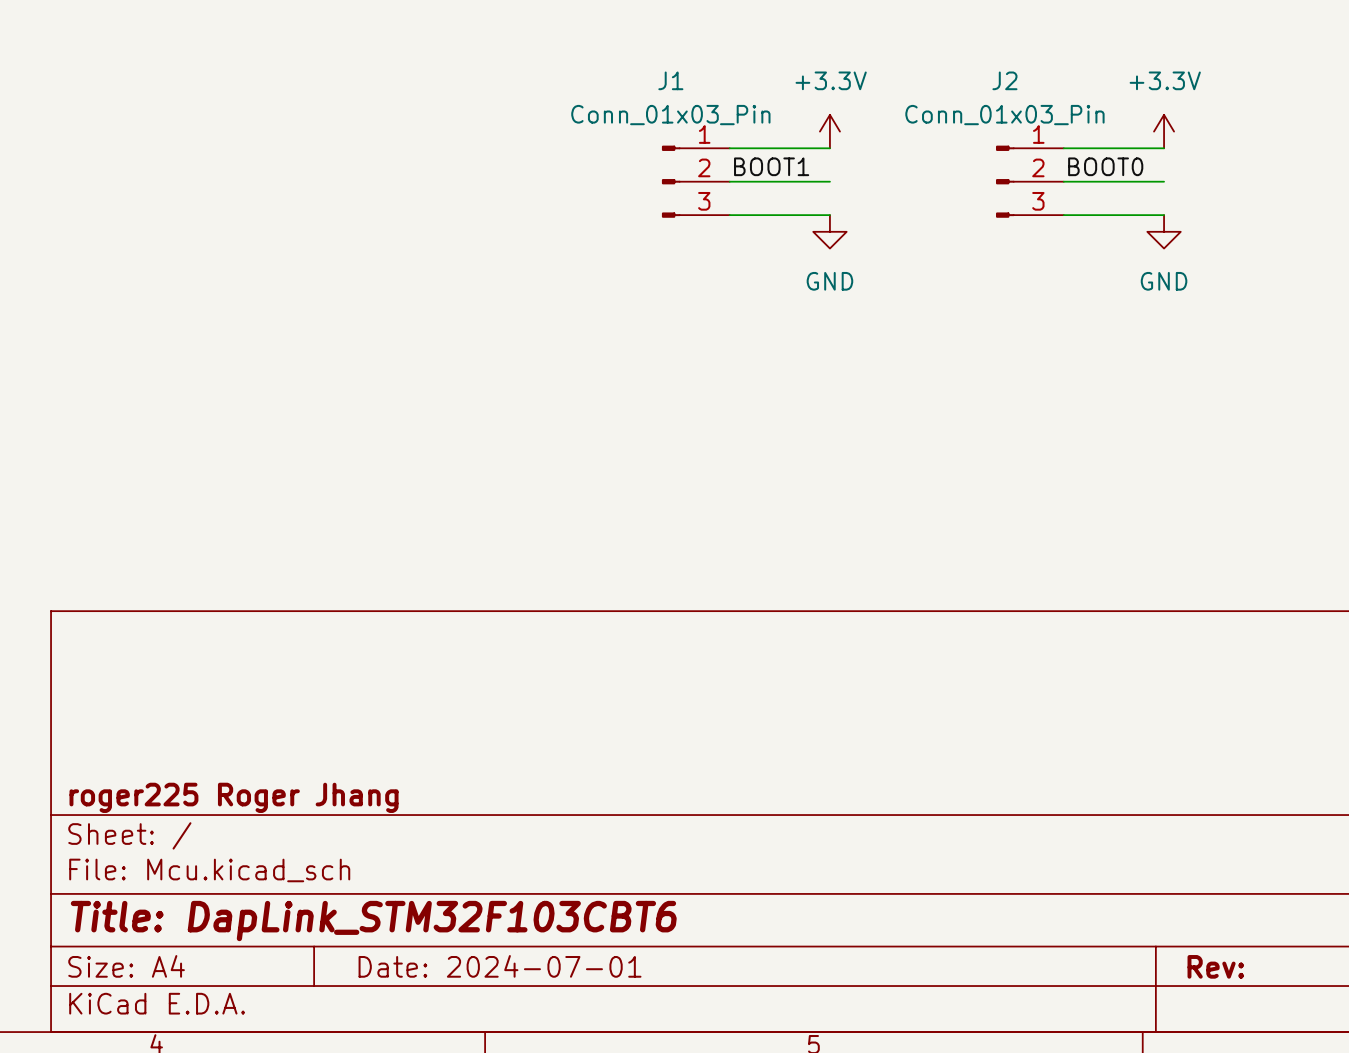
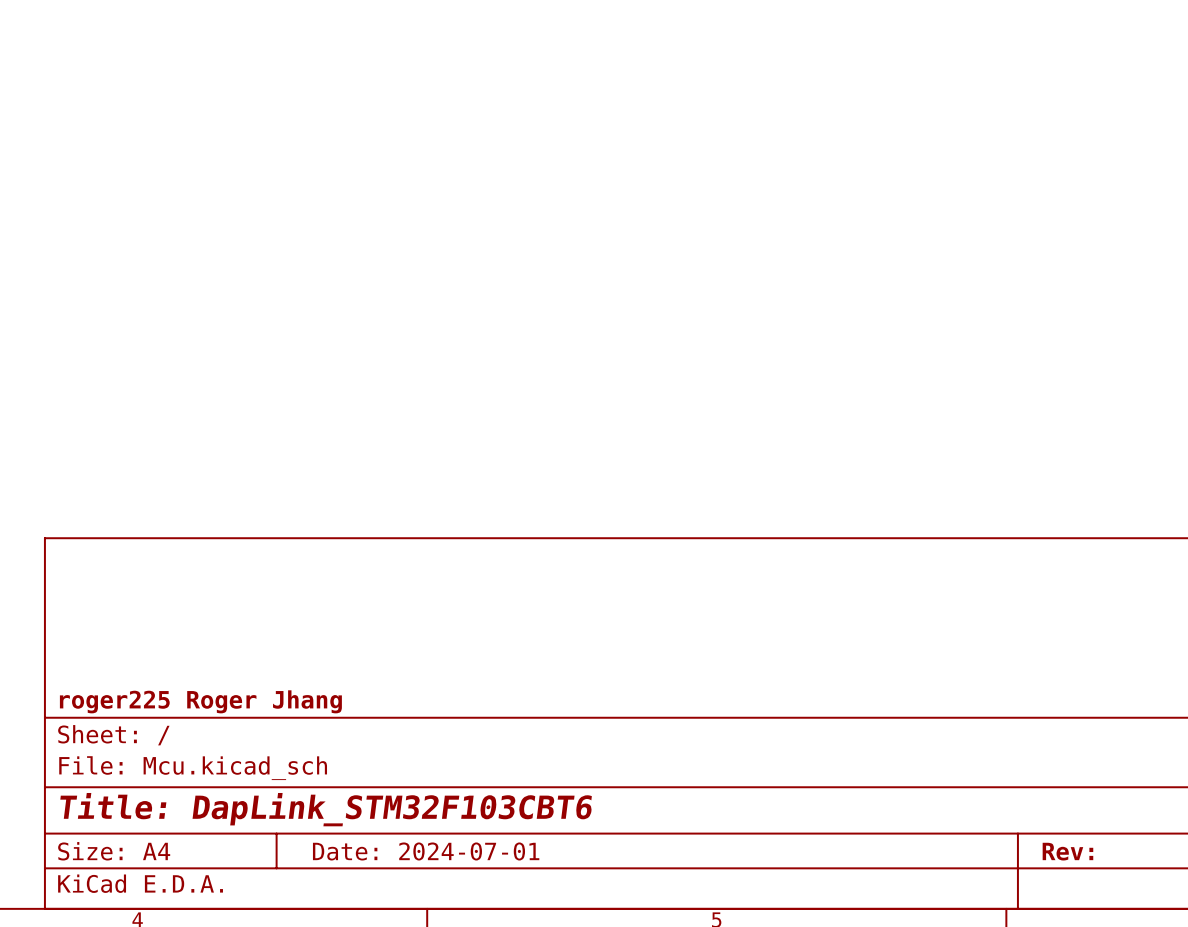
power symbol: +3.3V (829, 131) -> none
power symbol: +3.3V (1164, 131) -> none
wire: (729, 148) (829, 148) -> none
wire: (1063, 148) (1164, 148) -> none
label: BOOT1 (771, 166) -> none
label: BOOT0 (1105, 166) -> none
J1: Conn_01x03_Pin (695, 181) -> none
wire: (729, 181) (829, 181) -> none
J2: Conn_01x03_Pin (1029, 181) -> none
wire: (1063, 181) (1164, 181) -> none
wire: (729, 215) (829, 215) -> none
wire: (1063, 215) (1164, 215) -> none
power symbol: GND (829, 231) -> none
power symbol: GND (1164, 231) -> none

